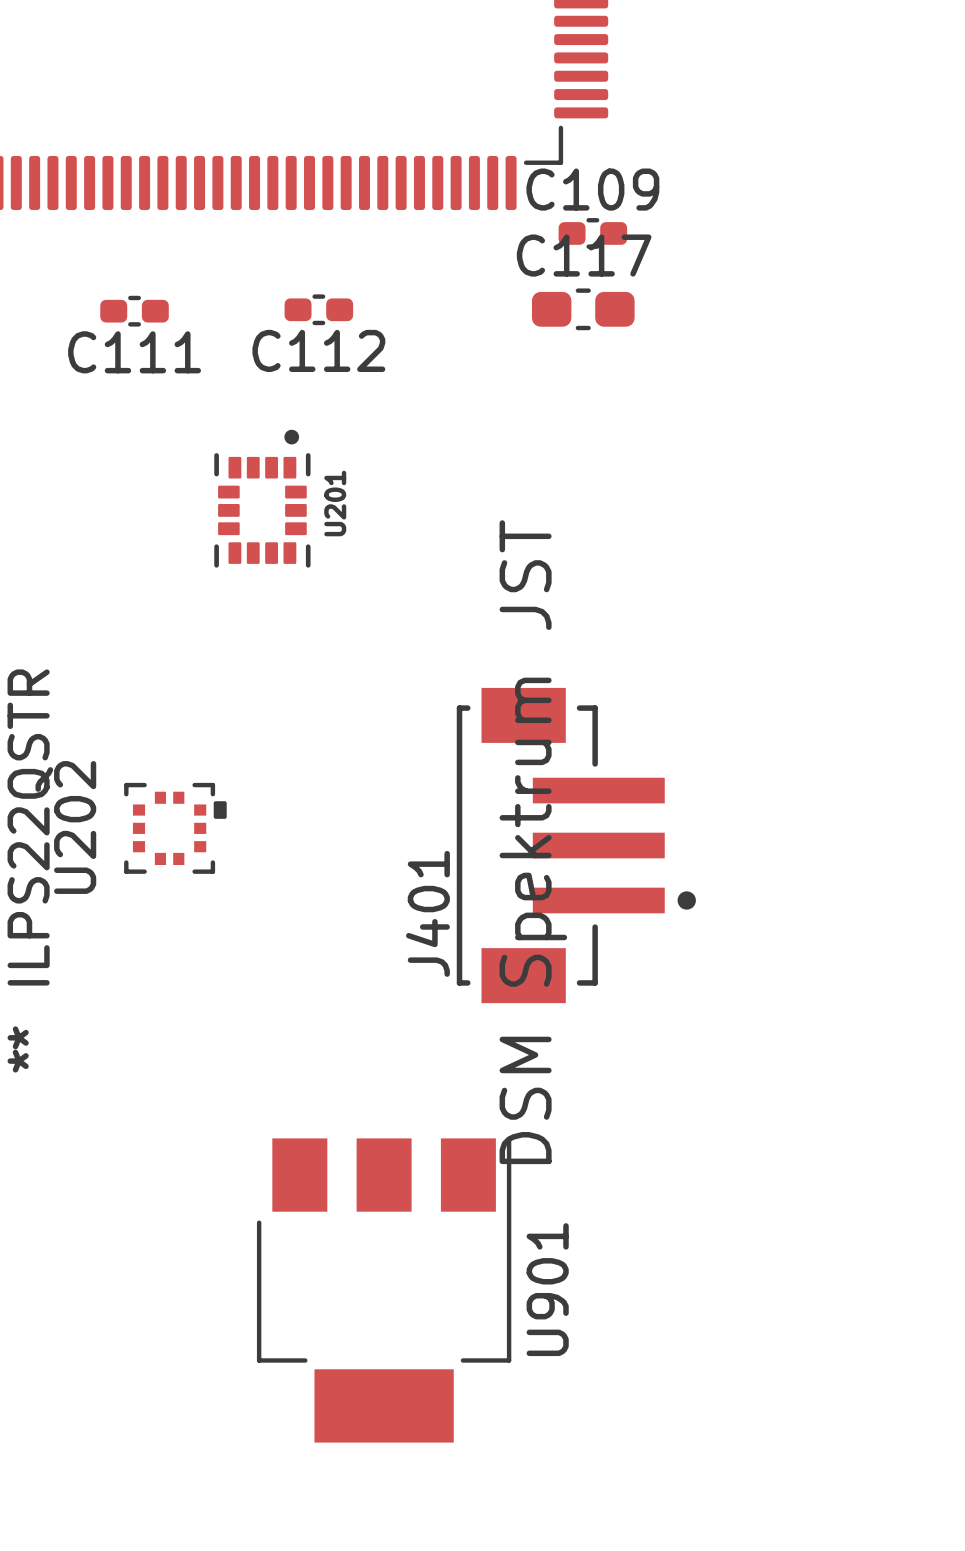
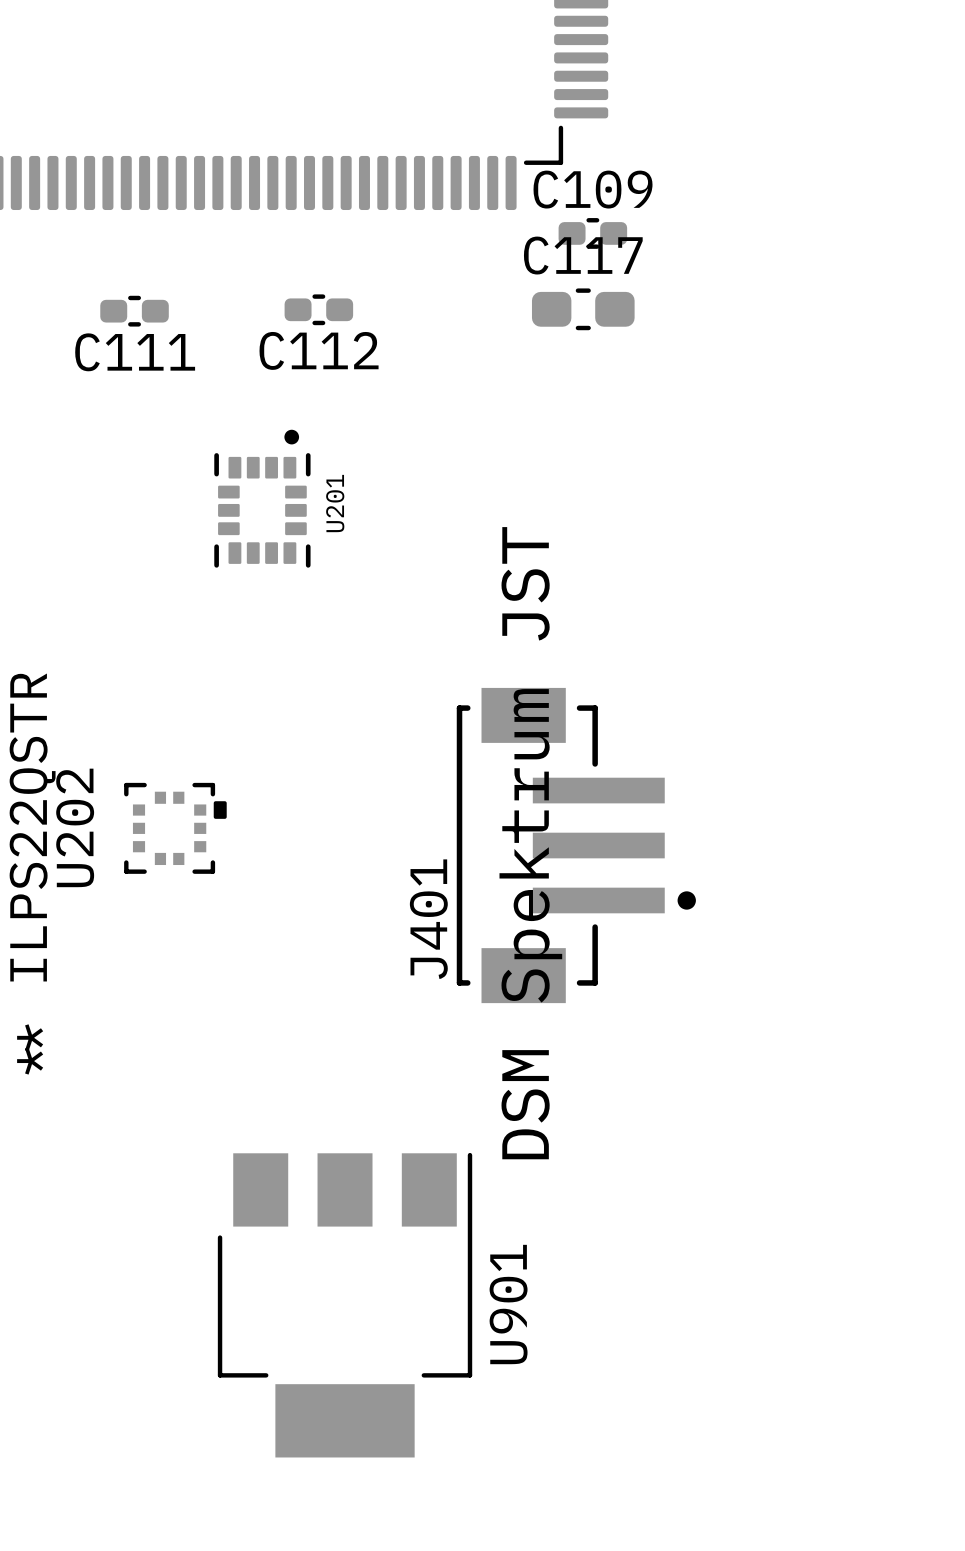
U901 position: (384, 1290) -> (345, 1305)

